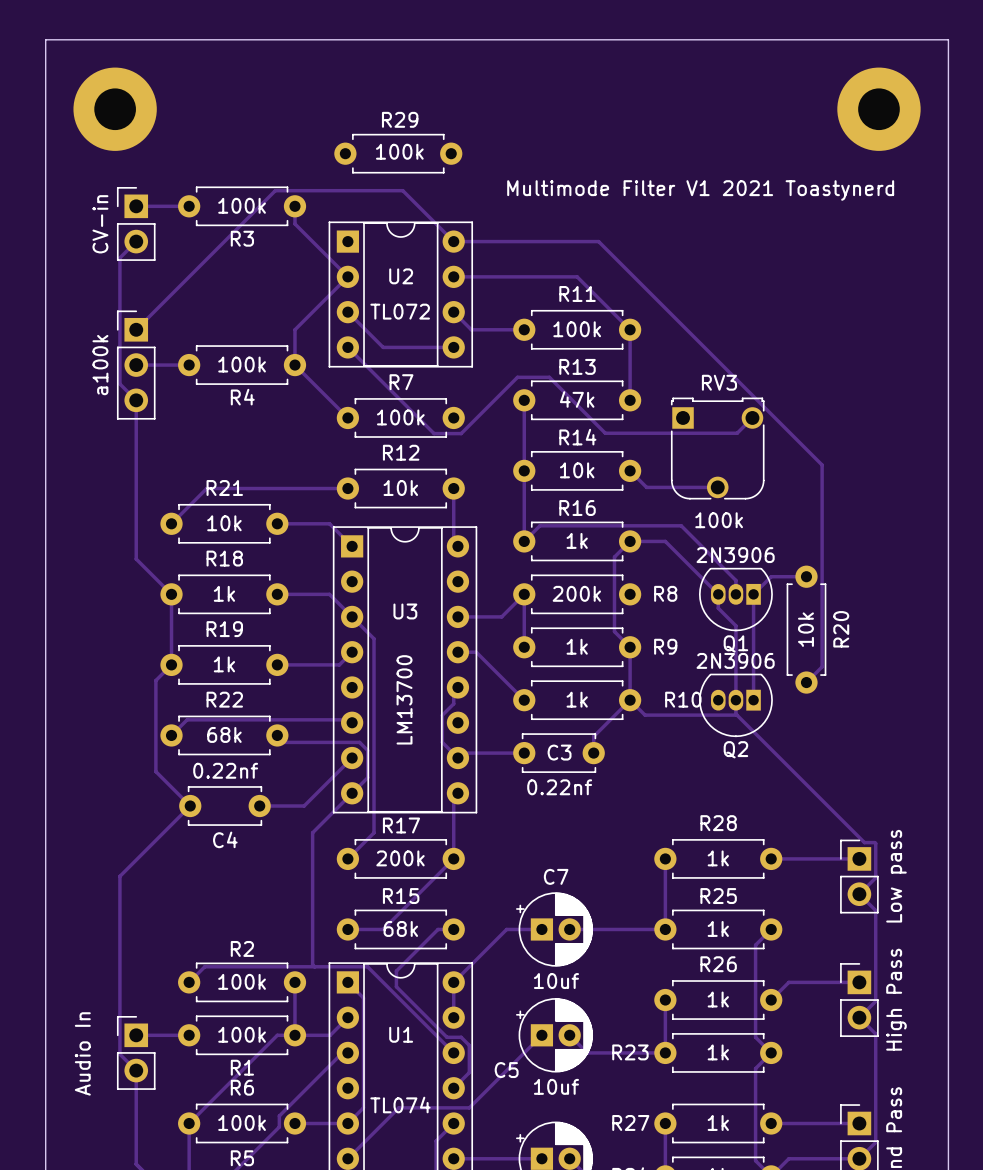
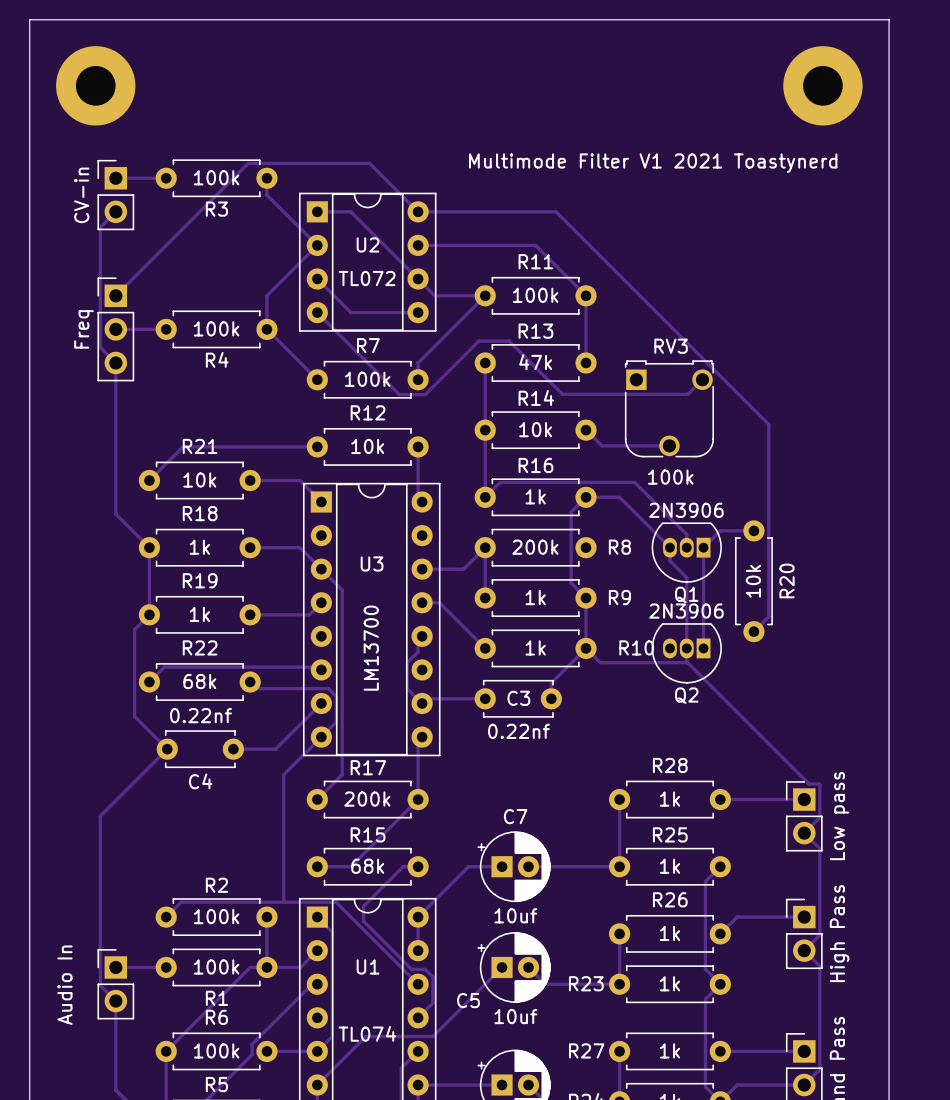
R29: 100k (398, 153) -> none
track: none -> (317, 211) (350, 211) (418, 279)
track: none -> (485, 295) (418, 362) (418, 379)
part value: a100k (100, 365) -> Freq (83, 329)

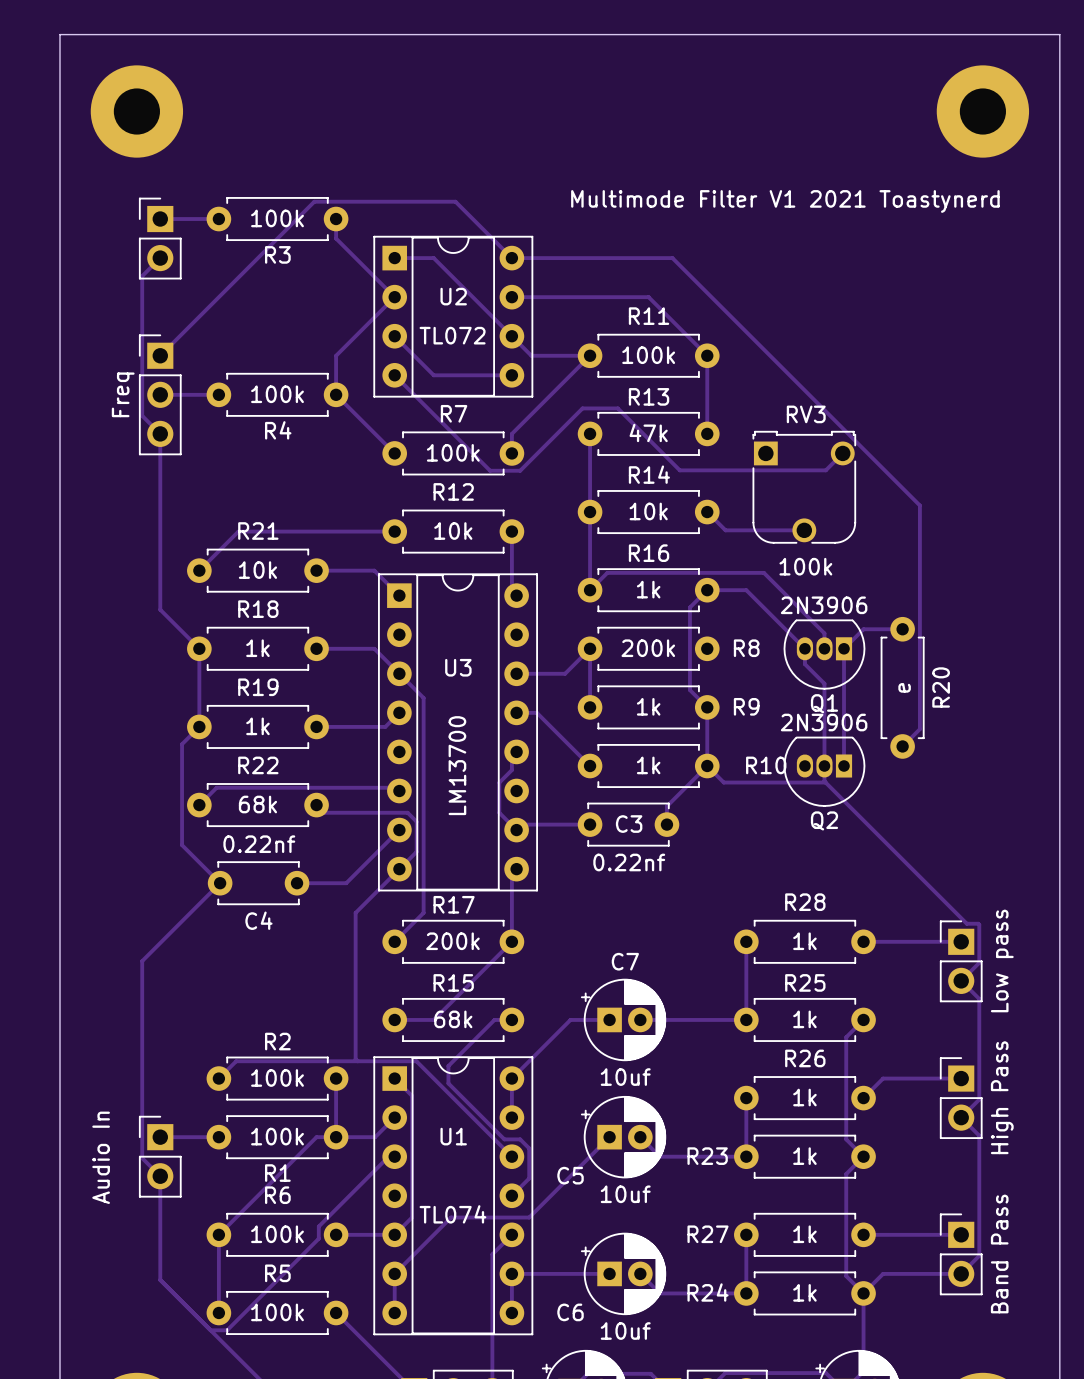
part value: CV-in (81, 195) -> none
R20 value: 10k (753, 581) -> e (904, 687)

